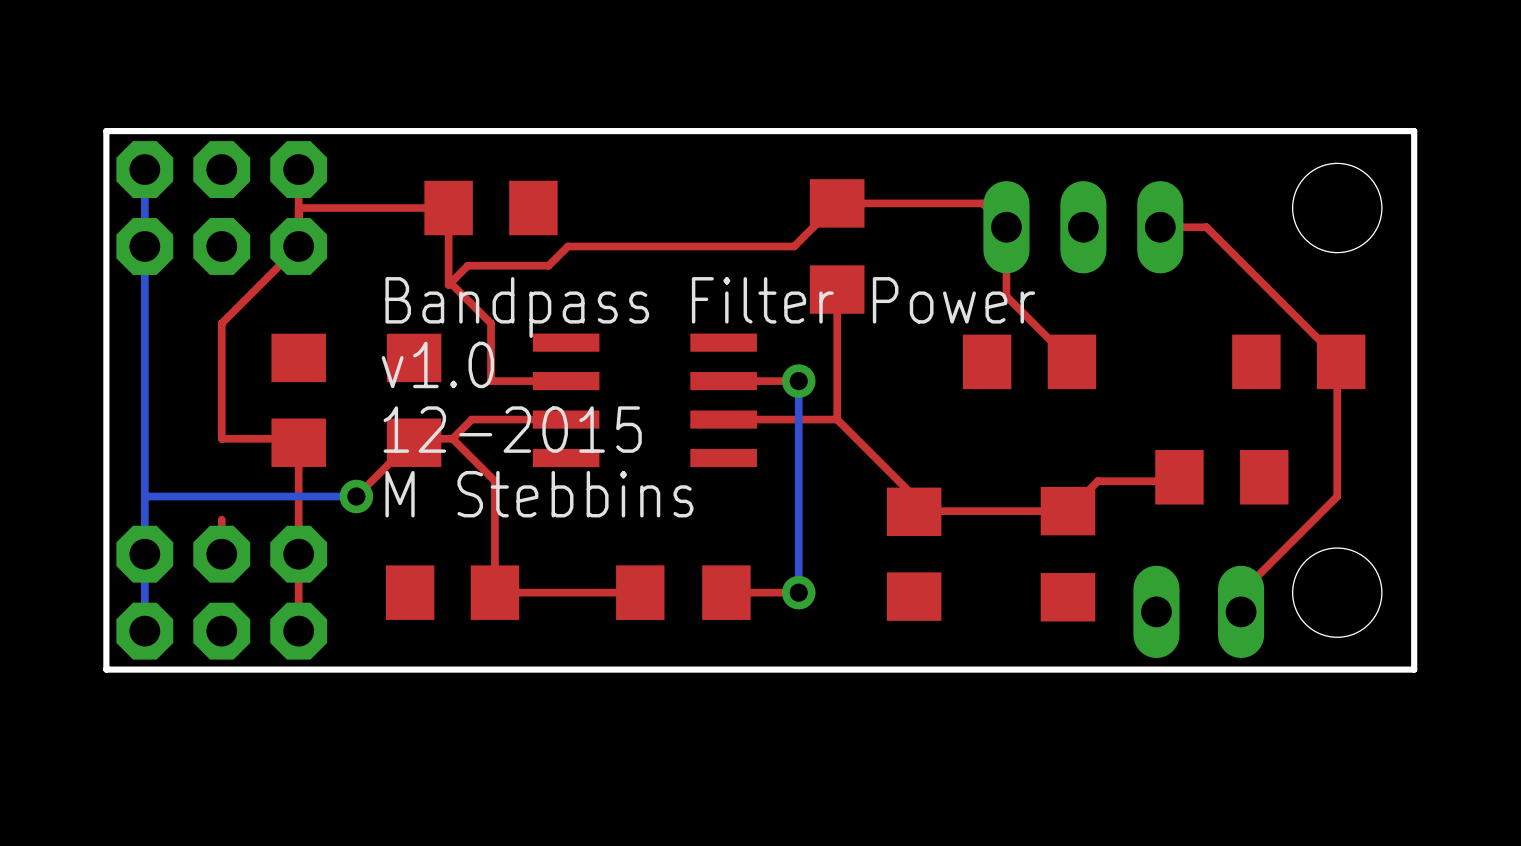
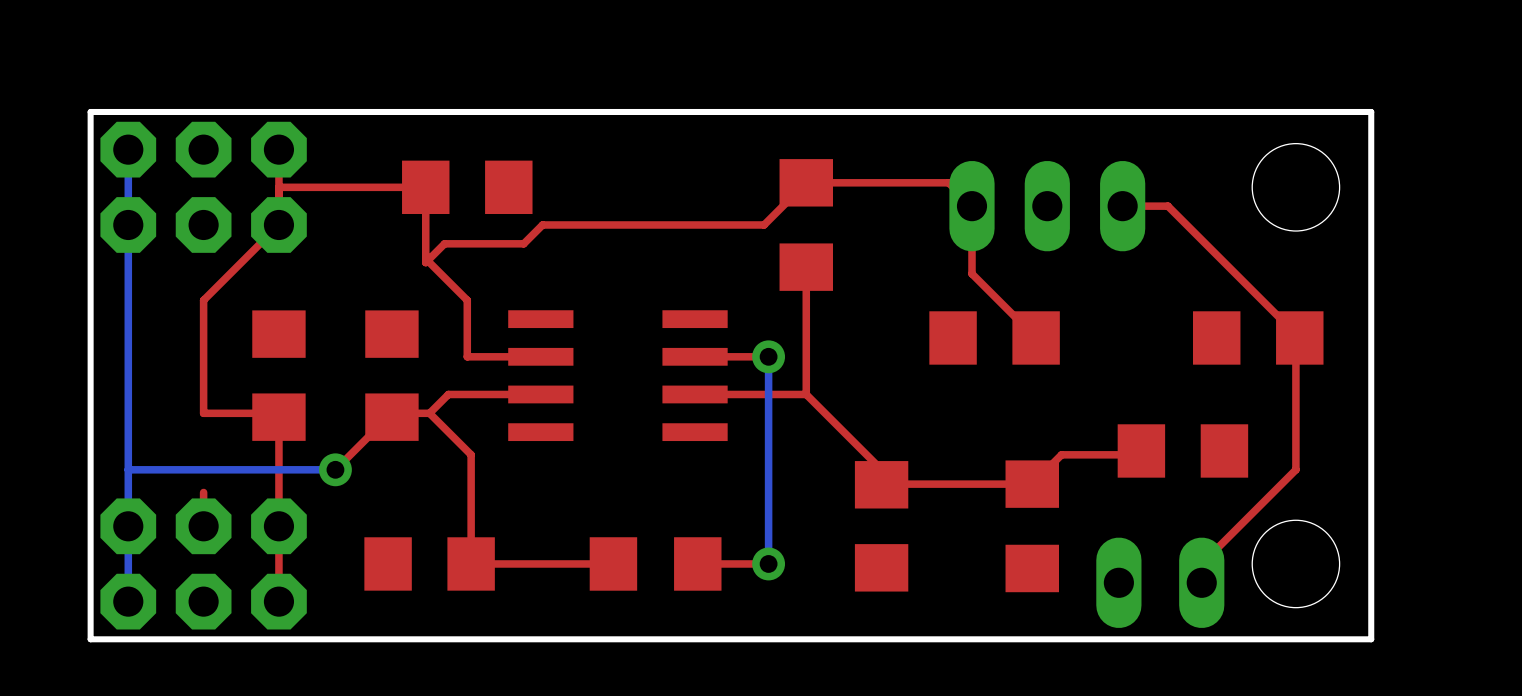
text: Bandpass Filter Power (710, 307) -> none
text: v1.0 (437, 364) -> none
text: 12-2015 (512, 429) -> none
text: M Stebbins (539, 494) -> none

